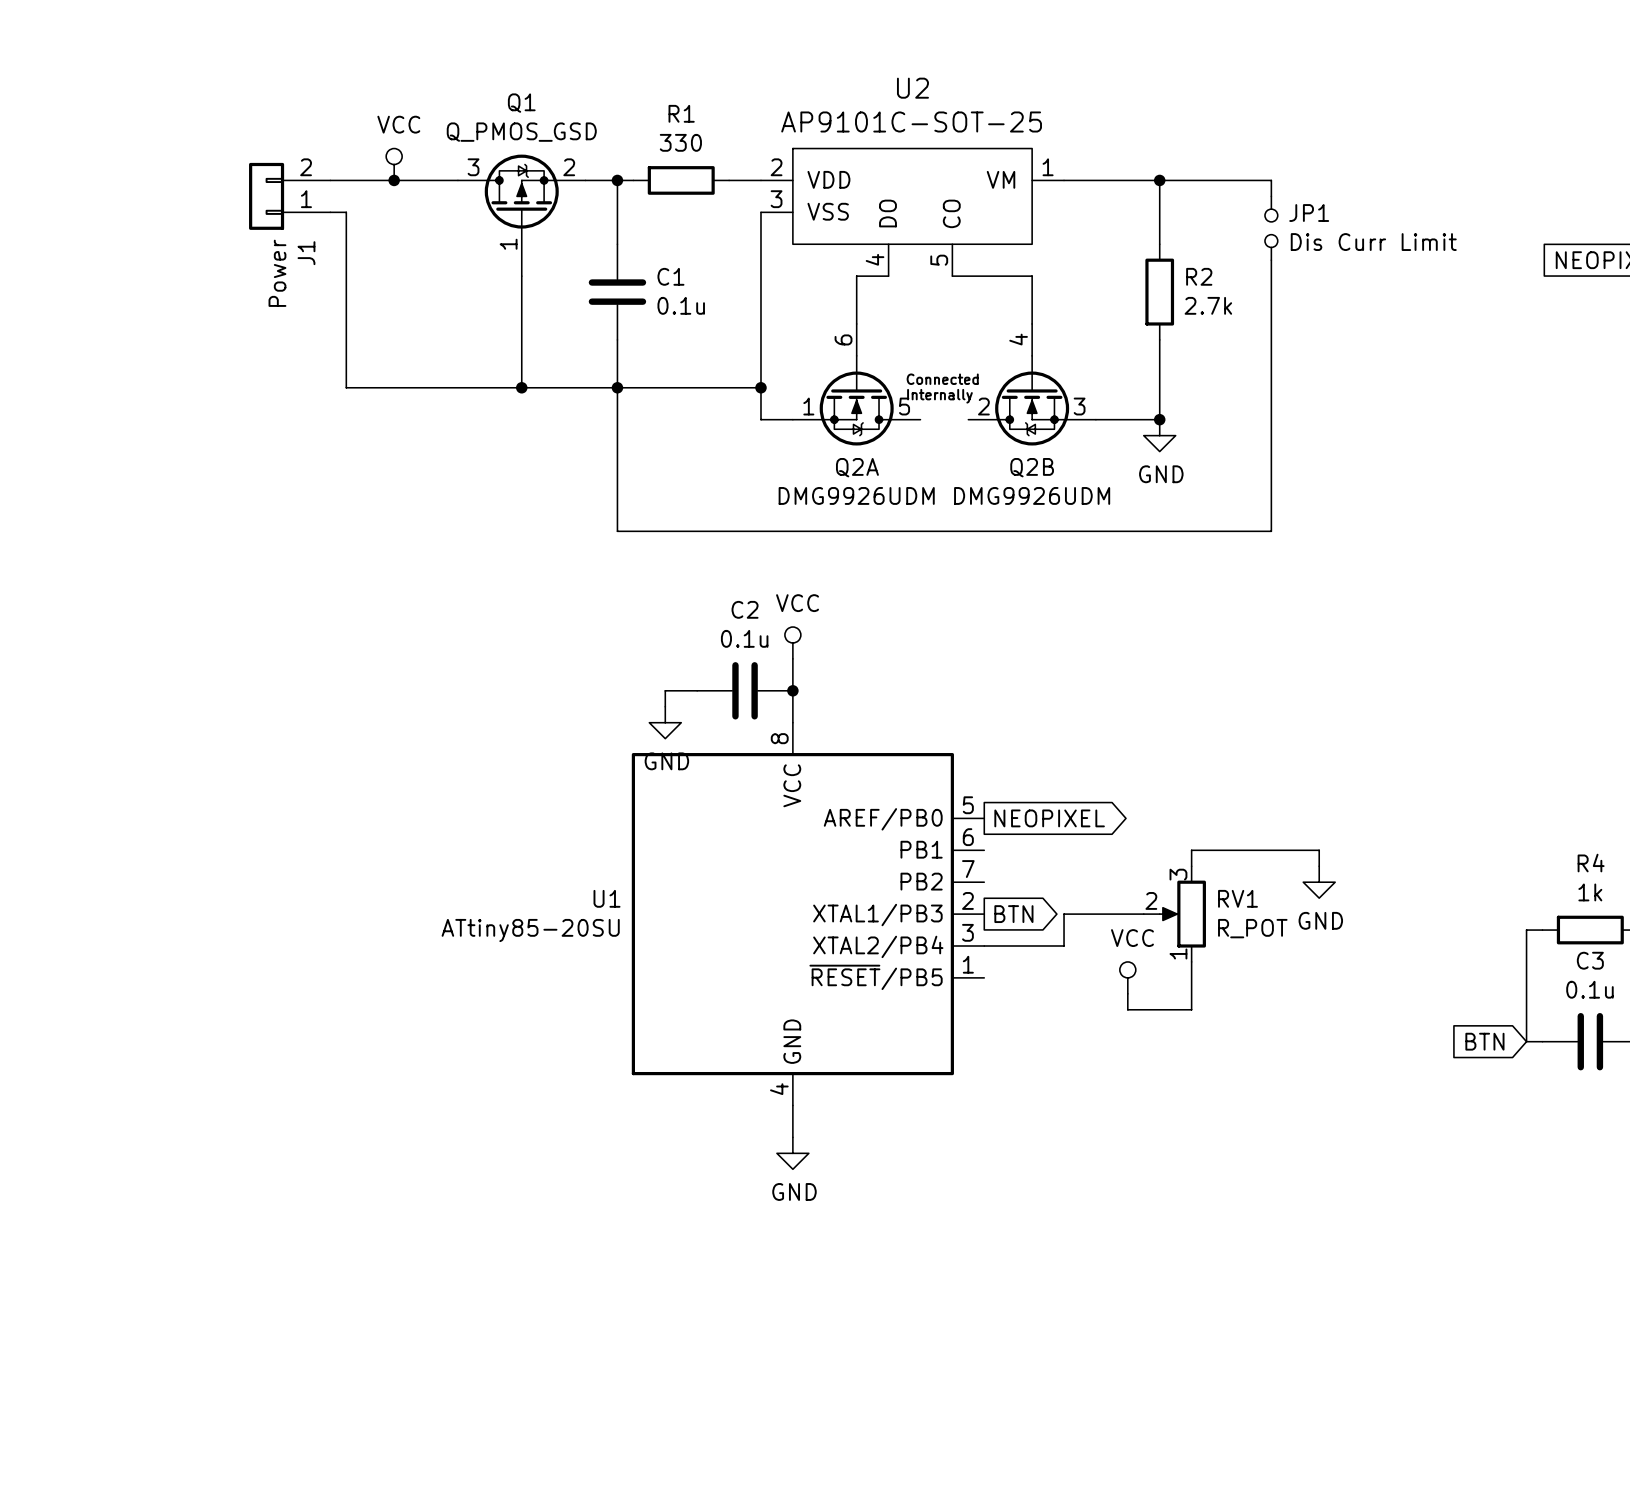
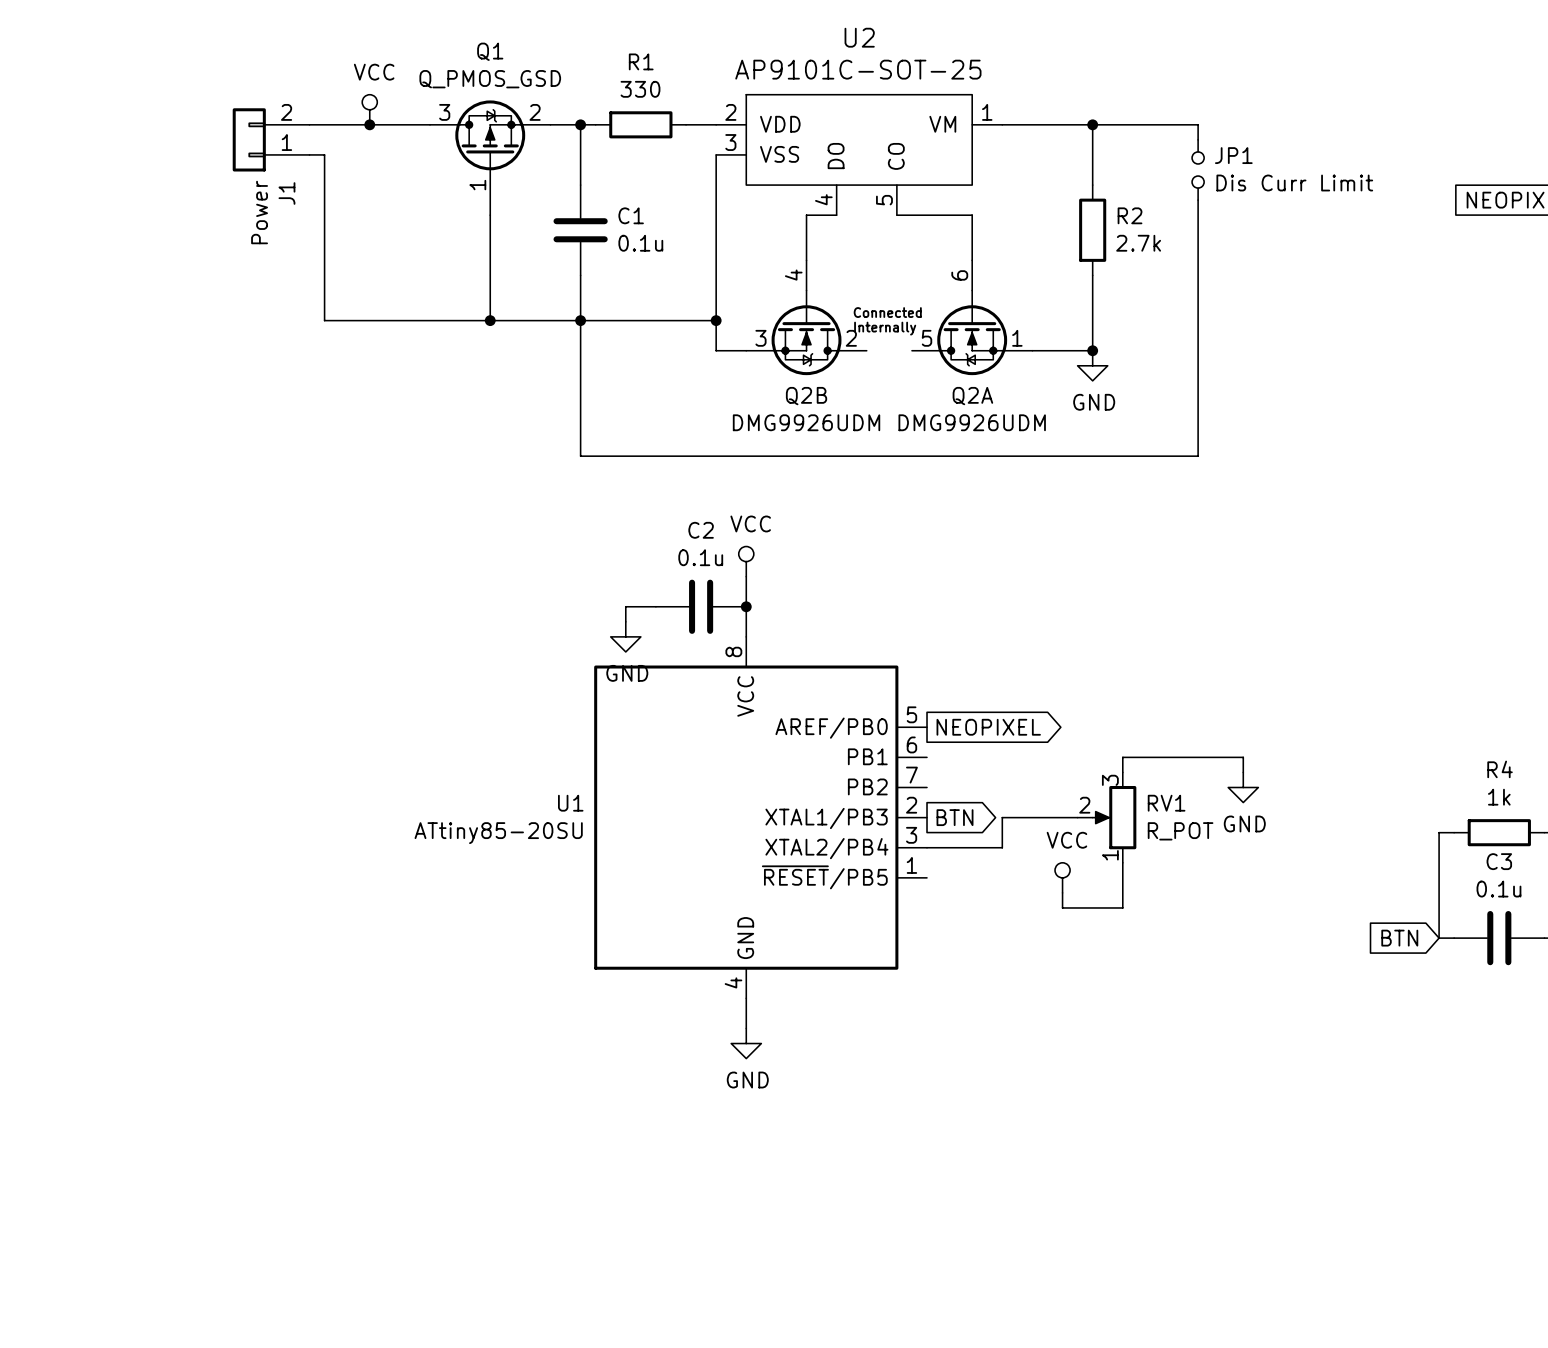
Q2A position: (856, 384) -> (972, 317)
Q2B position: (1032, 384) -> (806, 317)
Q2A flip: as is (856, 400) -> left-right (972, 332)
Q2B flip: as is (1032, 400) -> left-right (806, 332)

